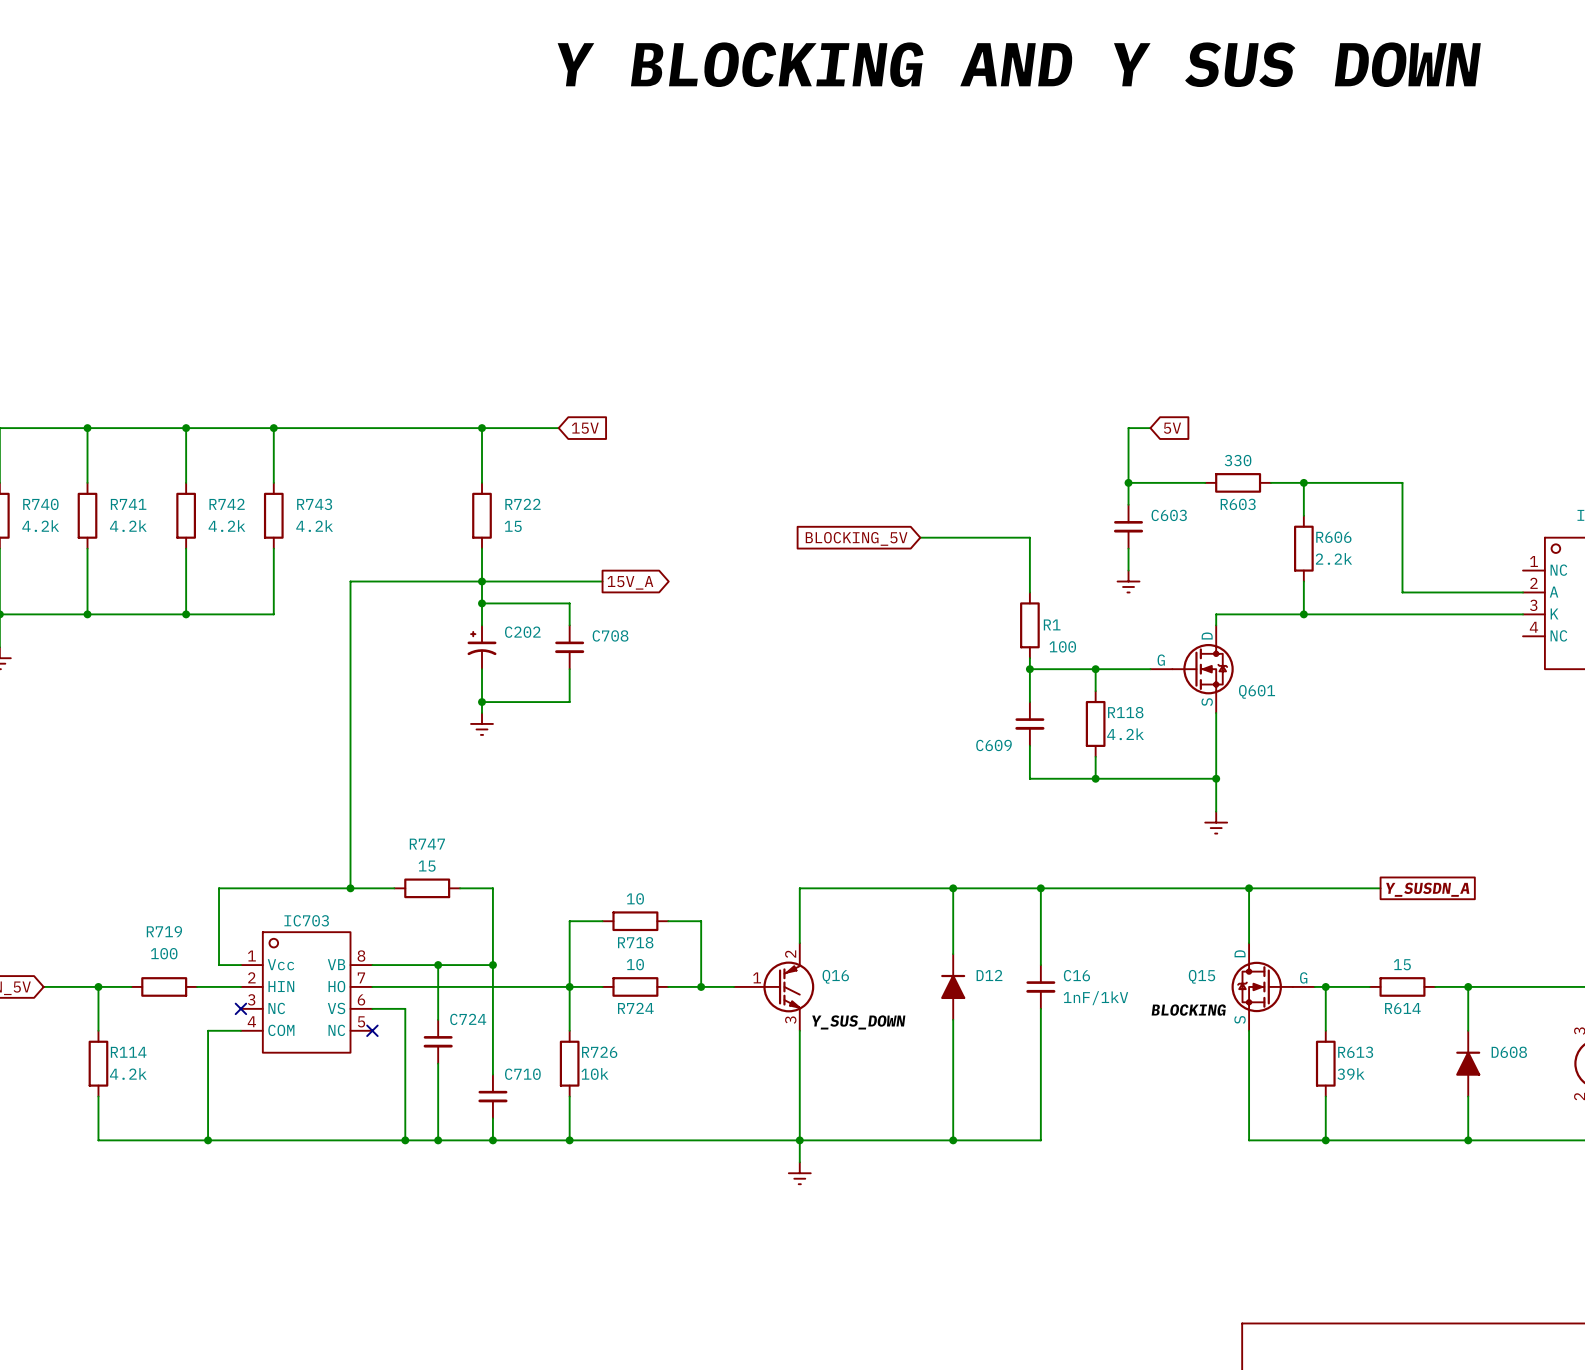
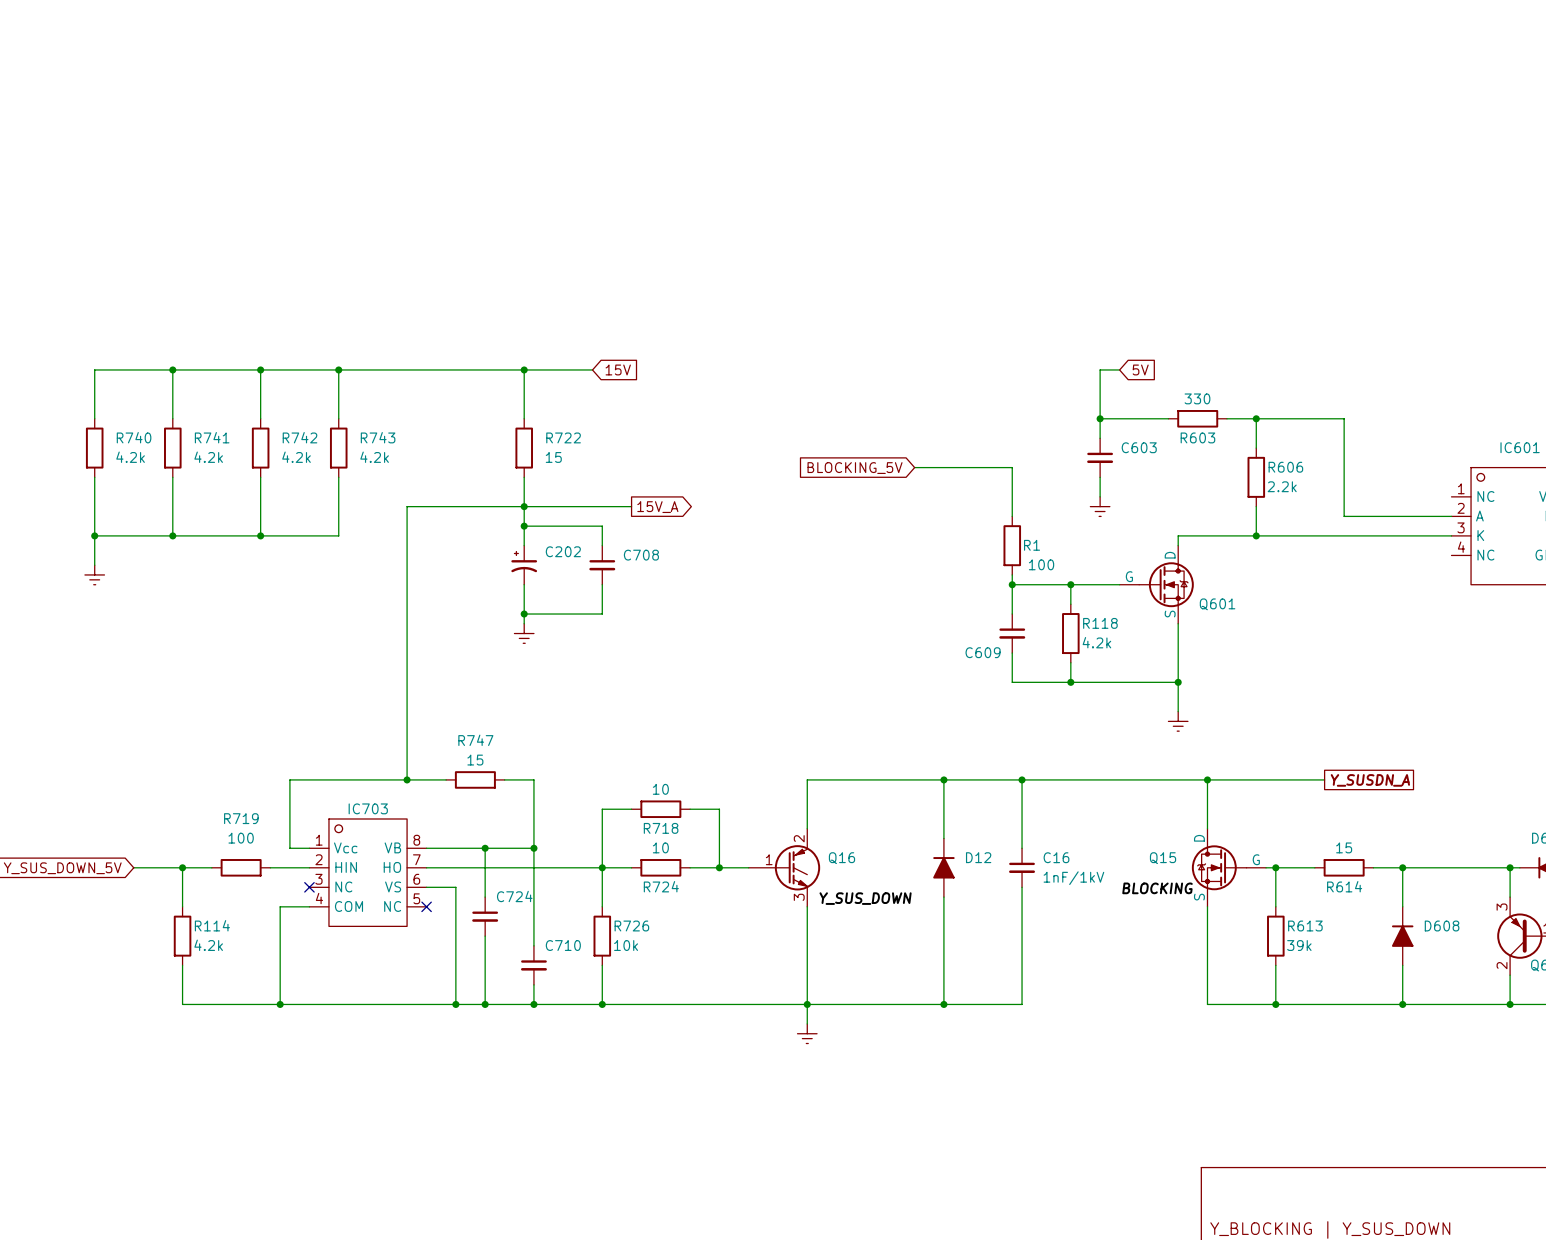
label: Y BLOCKING AND Y SUS DOWN (1019, 64) -> none

